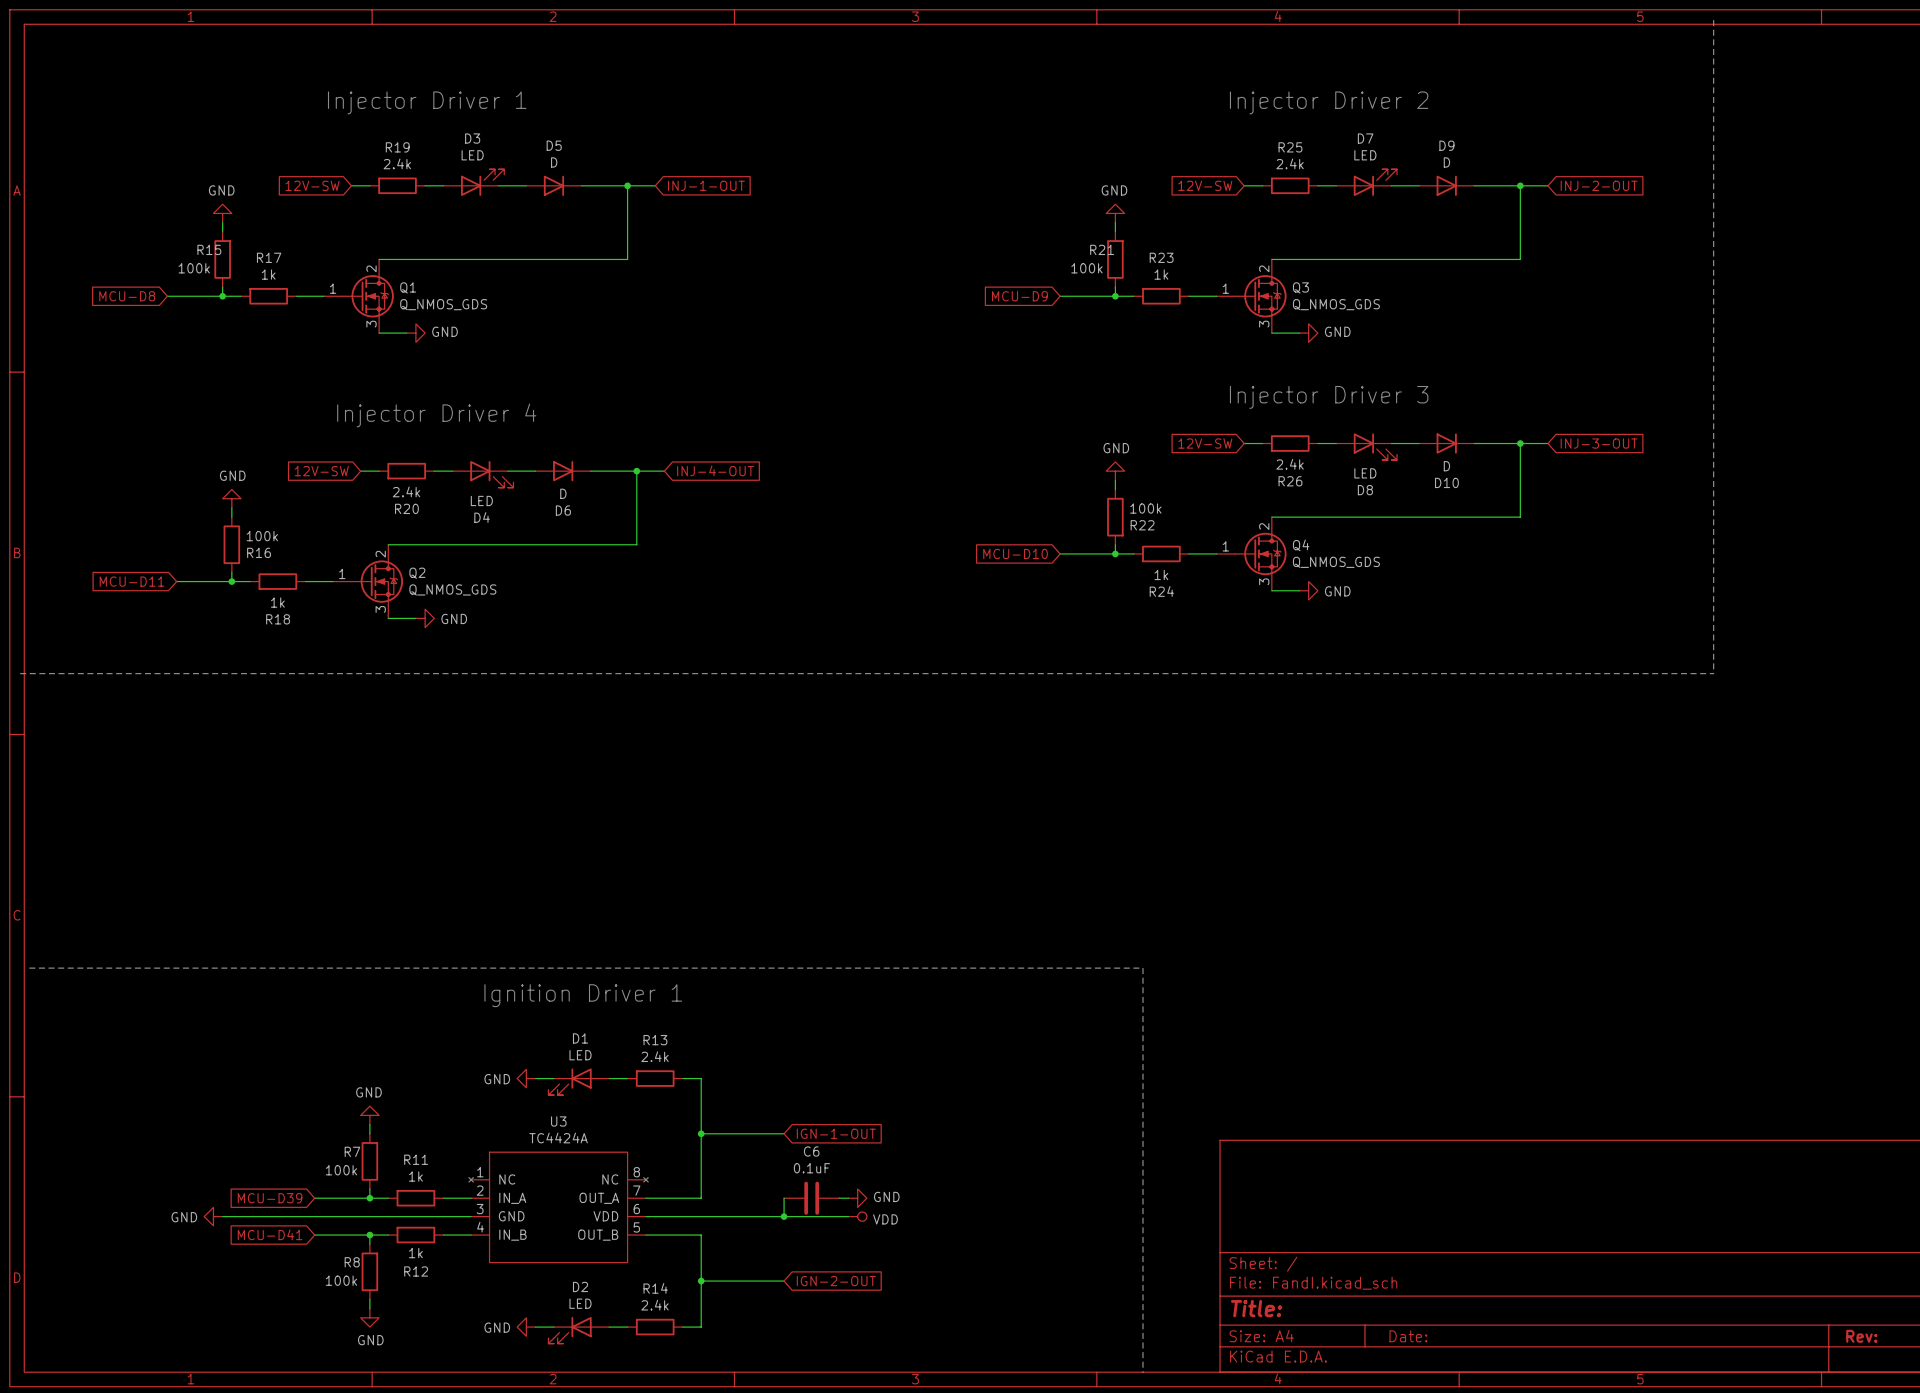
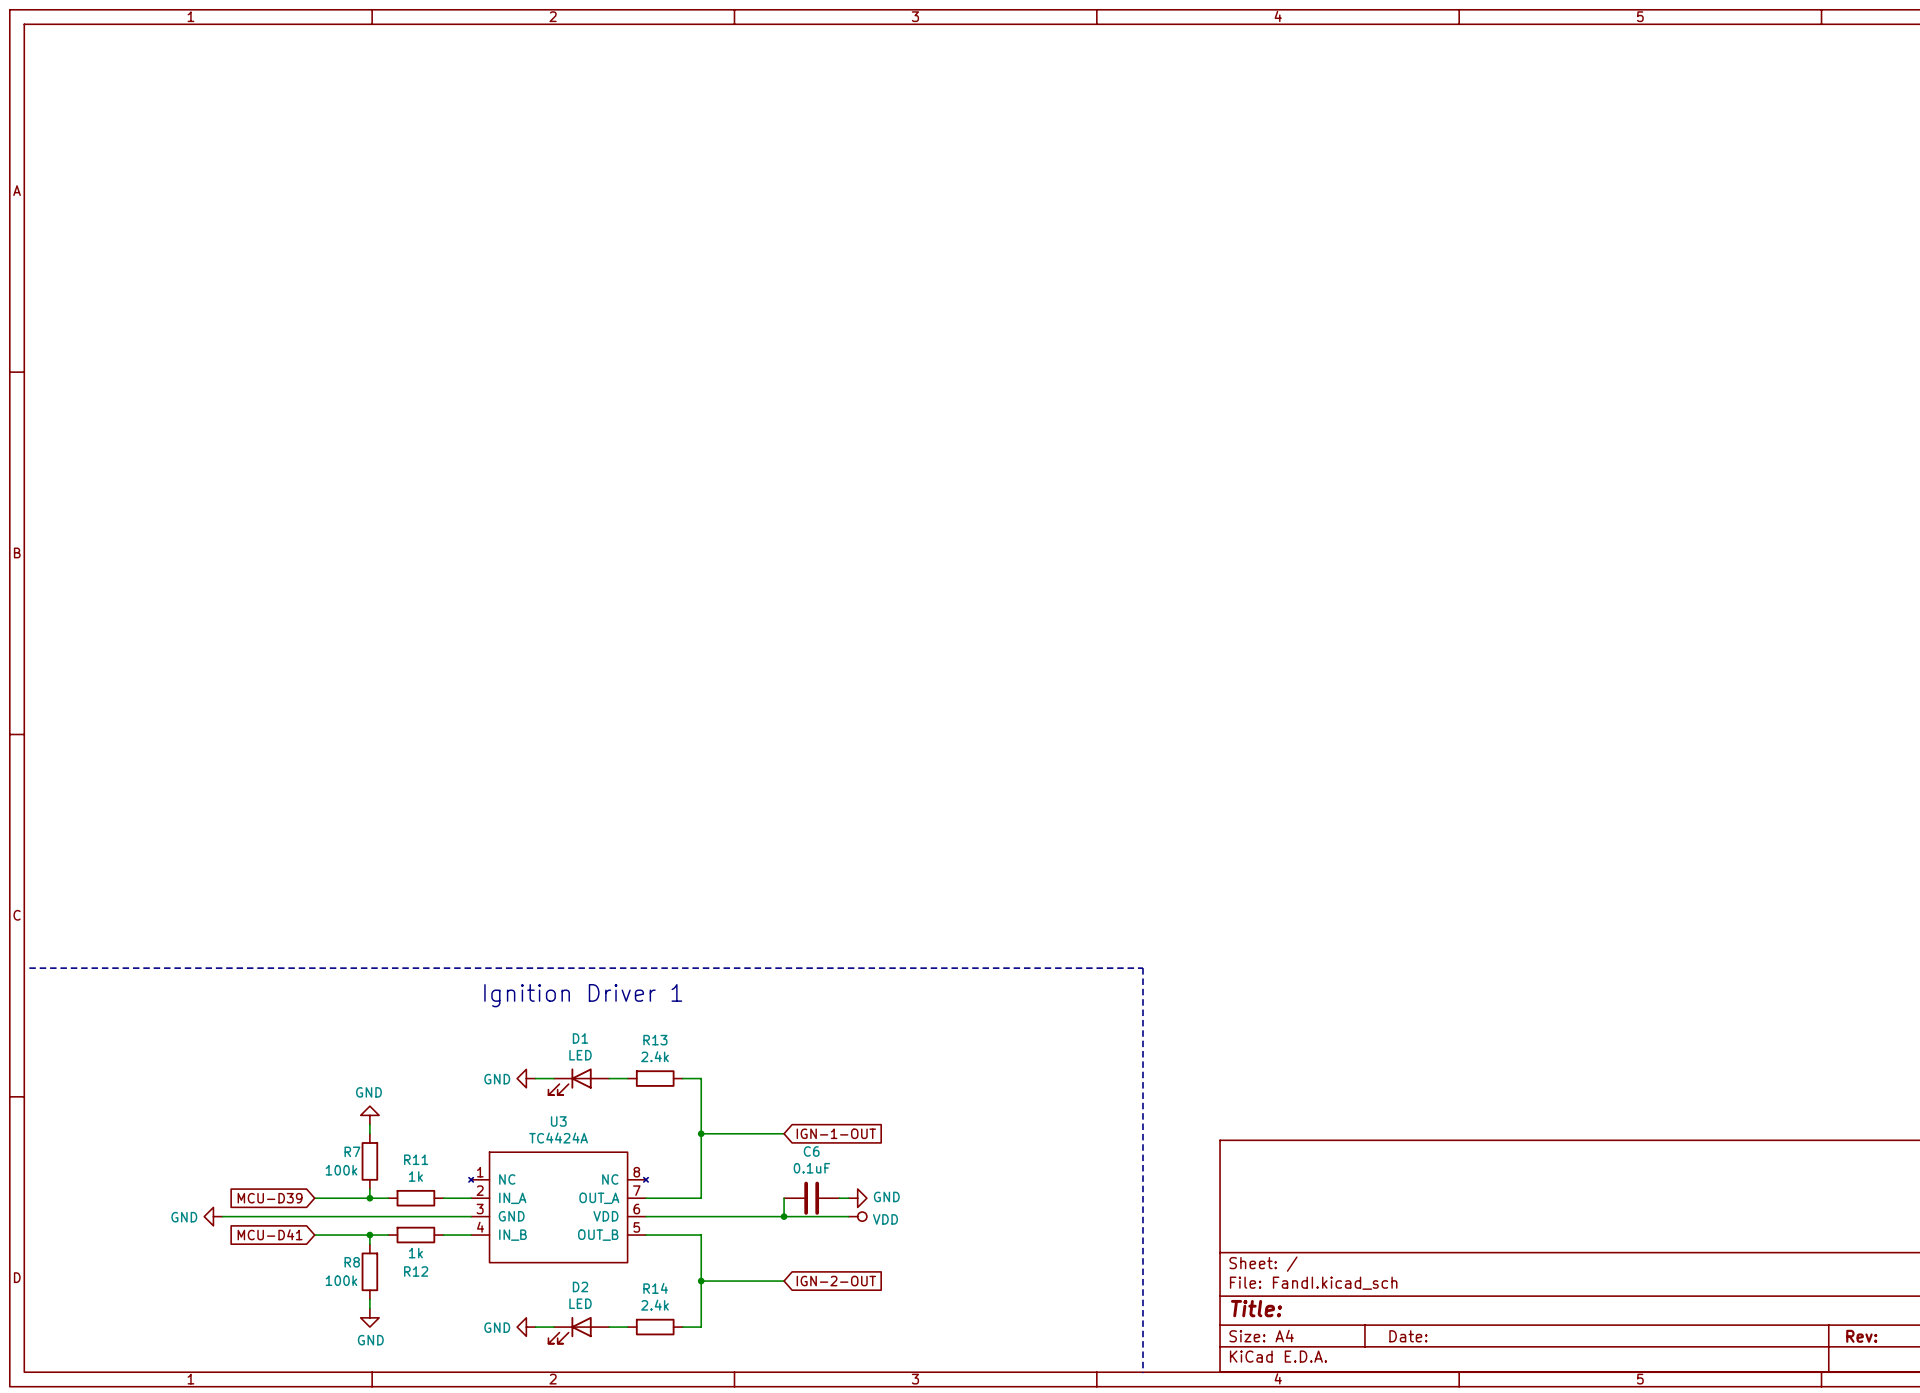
line: (1713, 20) (1713, 673) (20, 673) -> none
text: Injector Driver 1 (427, 102) -> none
text: Injector Driver 2 (1329, 102) -> none
D3: LED (473, 182) -> none
D7: LED (1366, 182) -> none
global label: 12V-SW (312, 185) -> none
wire: (351, 185) (369, 185) -> none
R19: 2.4k (397, 185) -> none
wire: (425, 185) (443, 185) -> none
wire: (498, 185) (526, 185) -> none
D5: D (553, 185) -> none
wire: (581, 185) (655, 185) -> none
wire: (627, 185) (627, 259) (379, 259) -> none
junction: (627, 185) -> none
global label: INJ-1-OUT (706, 185) -> none
global label: 12V-SW (1205, 185) -> none
wire: (1244, 185) (1262, 185) -> none
R25: 2.4k (1290, 185) -> none
wire: (1317, 185) (1336, 185) -> none
wire: (1391, 185) (1419, 185) -> none
D9: D (1446, 185) -> none
wire: (1474, 185) (1547, 185) -> none
wire: (1520, 185) (1520, 259) (1271, 259) -> none
junction: (1520, 185) -> none
global label: INJ-2-OUT (1599, 185) -> none
power symbol: GND (222, 213) -> none
power symbol: GND (1115, 213) -> none
wire: (222, 222) (222, 231) -> none
wire: (1115, 222) (1115, 231) -> none
R15: 100k (222, 259) -> none
R21: 100k (1115, 259) -> none
wire: (222, 287) (222, 296) -> none
wire: (1115, 287) (1115, 296) -> none
global label: MCU-D8 (127, 296) -> none
wire: (167, 296) (241, 296) -> none
junction: (222, 296) -> none
R17: 1k (268, 296) -> none
wire: (296, 296) (323, 296) -> none
Q1: Q_NMOS_GDS (358, 296) -> none
global label: MCU-D9 (1019, 296) -> none
wire: (1060, 296) (1133, 296) -> none
junction: (1115, 296) -> none
R23: 1k (1161, 296) -> none
wire: (1189, 296) (1216, 296) -> none
Q3: Q_NMOS_GDS (1251, 296) -> none
wire: (379, 333) (406, 333) -> none
power symbol: GND (415, 333) -> none
wire: (1271, 333) (1299, 333) -> none
power symbol: GND (1308, 333) -> none
text: Injector Driver 3 (1329, 397) -> none
text: Injector Driver 4 (436, 415) -> none
global label: 12V-SW (1205, 443) -> none
wire: (1244, 443) (1262, 443) -> none
R26: 2.4k (1290, 443) -> none
wire: (1317, 443) (1336, 443) -> none
wire: (1391, 443) (1419, 443) -> none
D10: D (1446, 443) -> none
wire: (1474, 443) (1547, 443) -> none
wire: (1520, 443) (1520, 517) (1271, 517) -> none
junction: (1520, 443) -> none
global label: INJ-3-OUT (1599, 443) -> none
D8: LED (1366, 446) -> none
global label: INJ-4-OUT (715, 470) -> none
global label: 12V-SW (321, 471) -> none
wire: (360, 471) (379, 471) -> none
R20: 2.4k (406, 471) -> none
wire: (434, 471) (452, 471) -> none
wire: (507, 471) (535, 471) -> none
D6: D (563, 471) -> none
wire: (590, 471) (664, 471) -> none
wire: (636, 471) (636, 544) (388, 544) -> none
junction: (636, 471) -> none
power symbol: GND (1115, 471) -> none
D4: LED (483, 474) -> none
wire: (1115, 480) (1115, 489) -> none
power symbol: GND (231, 498) -> none
wire: (231, 507) (231, 517) -> none
R22: 100k (1115, 517) -> none
R16: 100k (231, 544) -> none
wire: (1115, 544) (1115, 553) -> none
global label: MCU-D10 (1015, 553) -> none
wire: (1060, 553) (1133, 553) -> none
junction: (1115, 553) -> none
R24: 1k (1161, 553) -> none
wire: (1189, 553) (1216, 553) -> none
Q4: Q_NMOS_GDS (1251, 553) -> none
wire: (231, 572) (231, 581) -> none
global label: MCU-D11 (132, 581) -> none
wire: (176, 581) (250, 581) -> none
junction: (231, 581) -> none
R18: 1k (277, 581) -> none
wire: (305, 581) (333, 581) -> none
Q2: Q_NMOS_GDS (368, 581) -> none
wire: (1271, 590) (1299, 590) -> none
power symbol: GND (1308, 590) -> none
wire: (388, 618) (415, 618) -> none
power symbol: GND (425, 618) -> none

